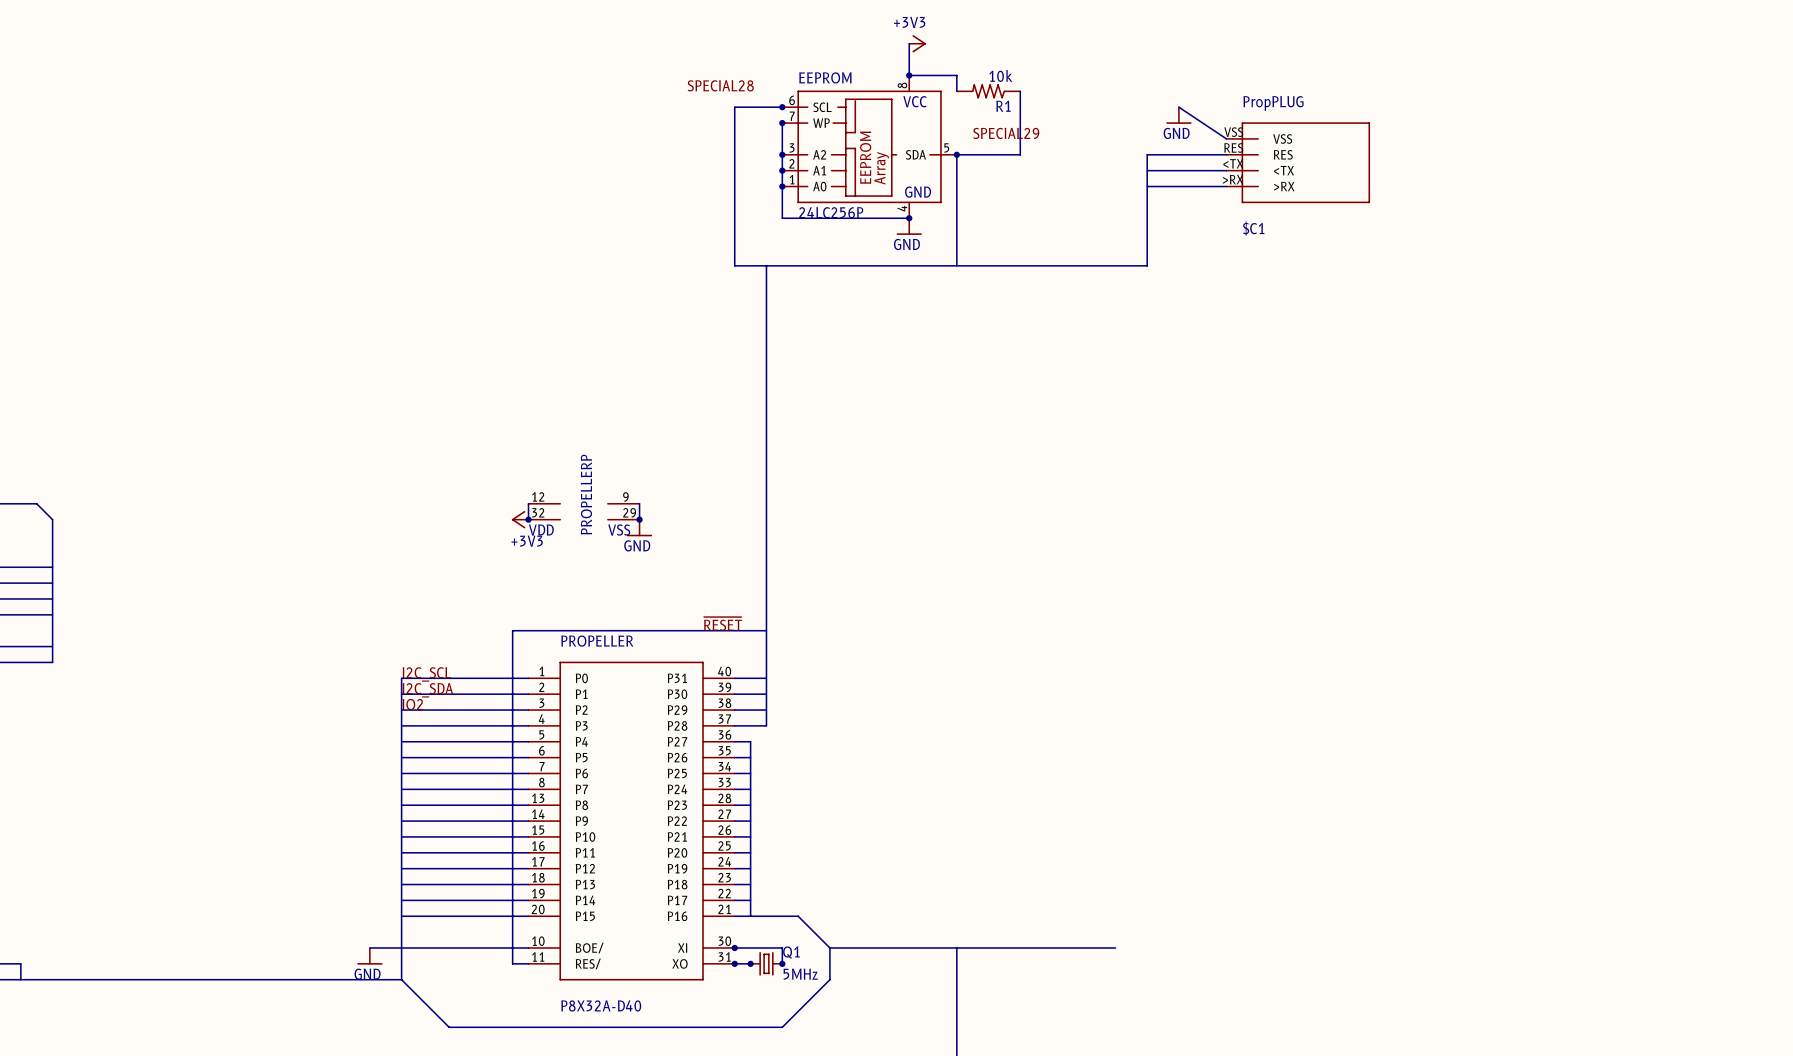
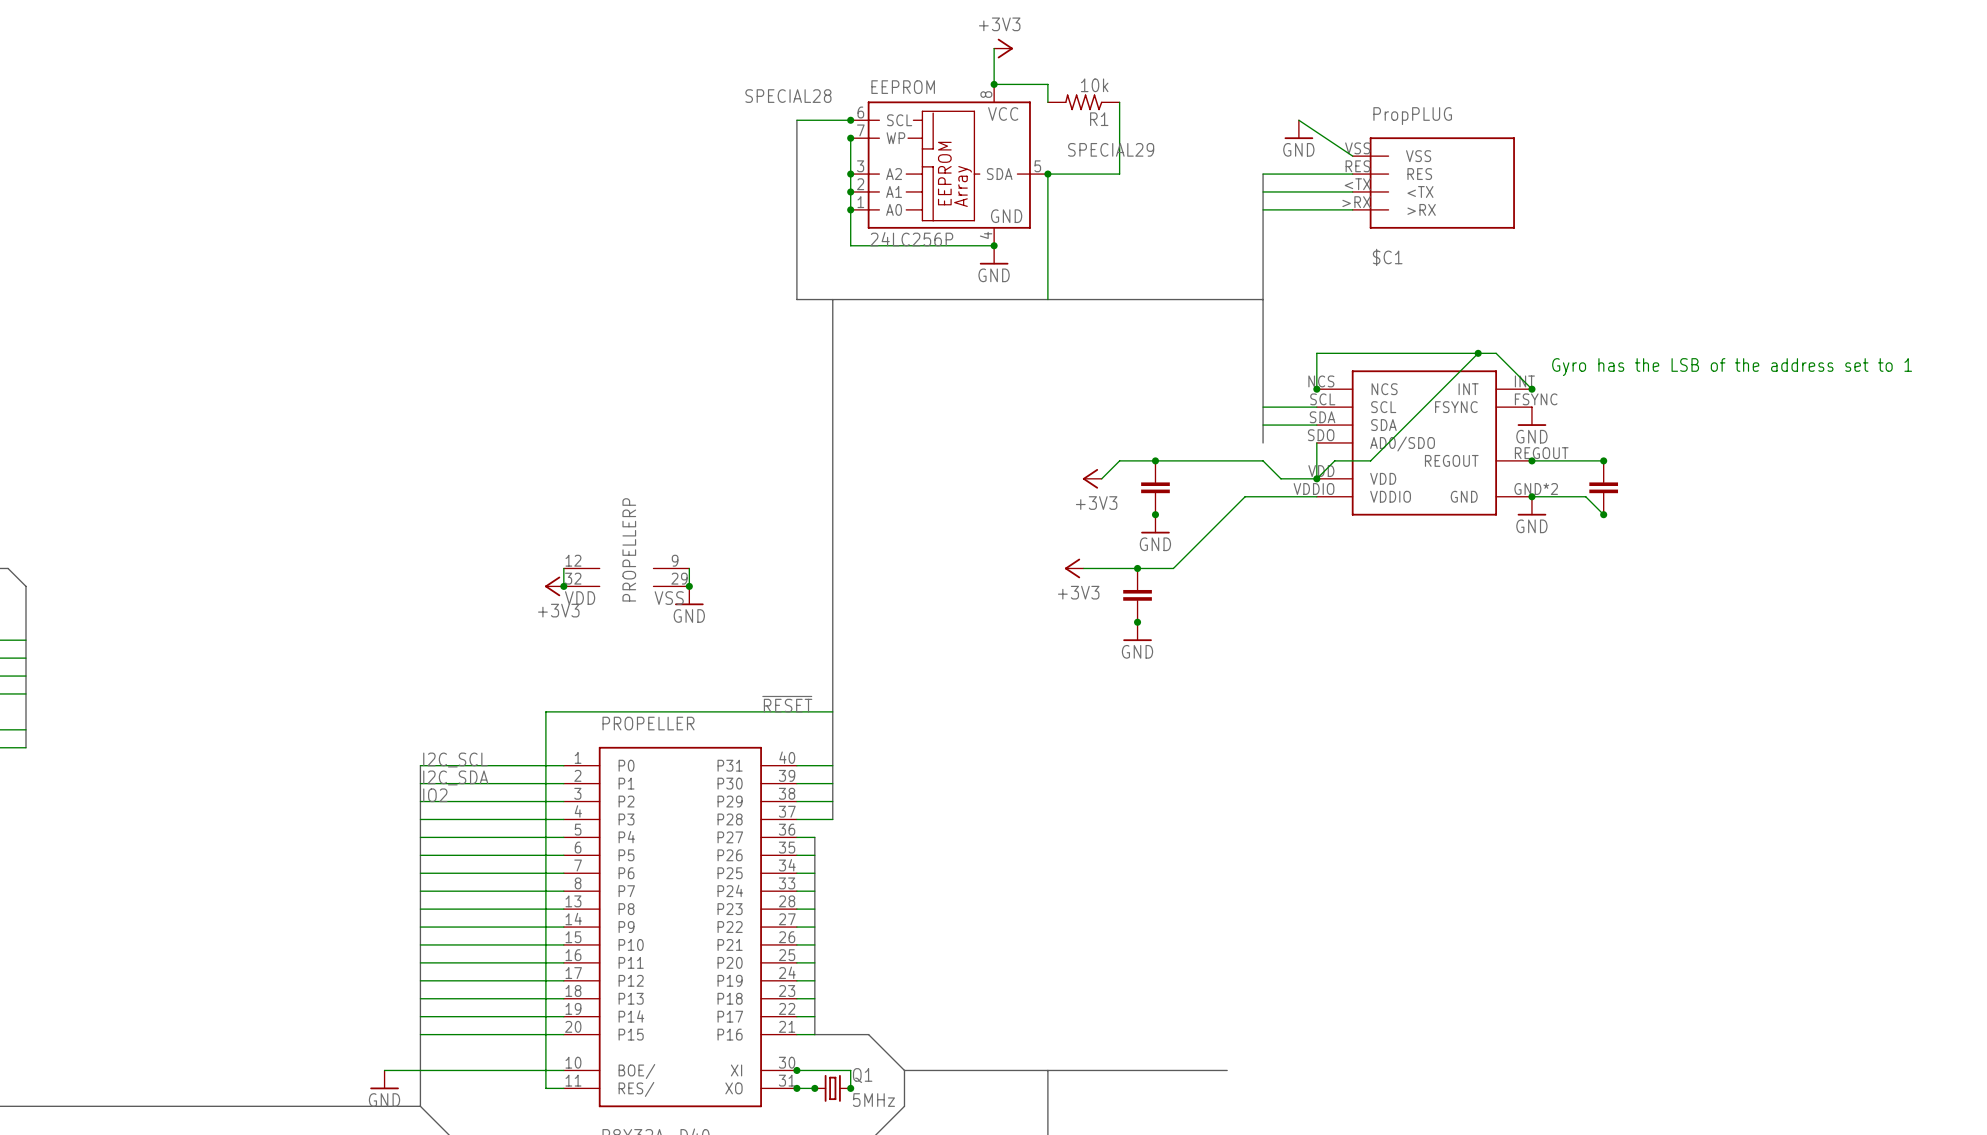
bus: none -> (1263, 299) (1263, 442)
wire: none -> (1478, 353) (1370, 460) (1334, 460) (1316, 478)
junction: none -> (1478, 353)
text: none -> Gyro has the LSB of the address set to 1 (1732, 367)
wire: none -> (1316, 389) (1316, 353) (1496, 353) (1531, 389)
junction: none -> (1316, 389)
junction: none -> (1531, 389)
wire: none -> (1263, 407) (1316, 407)
power symbol: none -> GND (1531, 416)
wire: none -> (1263, 425) (1316, 425)
wire: none -> (1316, 442) (1316, 478)
part: none -> (1424, 442)
junction: none -> (1155, 460)
wire: none -> (1531, 460) (1603, 460)
junction: none -> (1531, 460)
junction: none -> (1603, 460)
power symbol: none -> +3V3 (1092, 478)
wire: none -> (1101, 478) (1119, 460) (1263, 460) (1280, 478) (1316, 478)
junction: none -> (1316, 478)
part: none -> (1155, 487)
part: none -> (1603, 487)
wire: none -> (1316, 496) (1245, 496) (1173, 568) (1083, 568)
wire: none -> (1531, 496) (1585, 496) (1603, 514)
junction: none -> (1531, 496)
power symbol: none -> GND (1531, 506)
junction: none -> (1155, 514)
junction: none -> (1603, 514)
power symbol: none -> GND (1155, 524)
power symbol: none -> +3V3 (1074, 568)
junction: none -> (1137, 568)
part: none -> (1137, 595)
junction: none -> (1137, 622)
power symbol: none -> GND (1137, 631)

